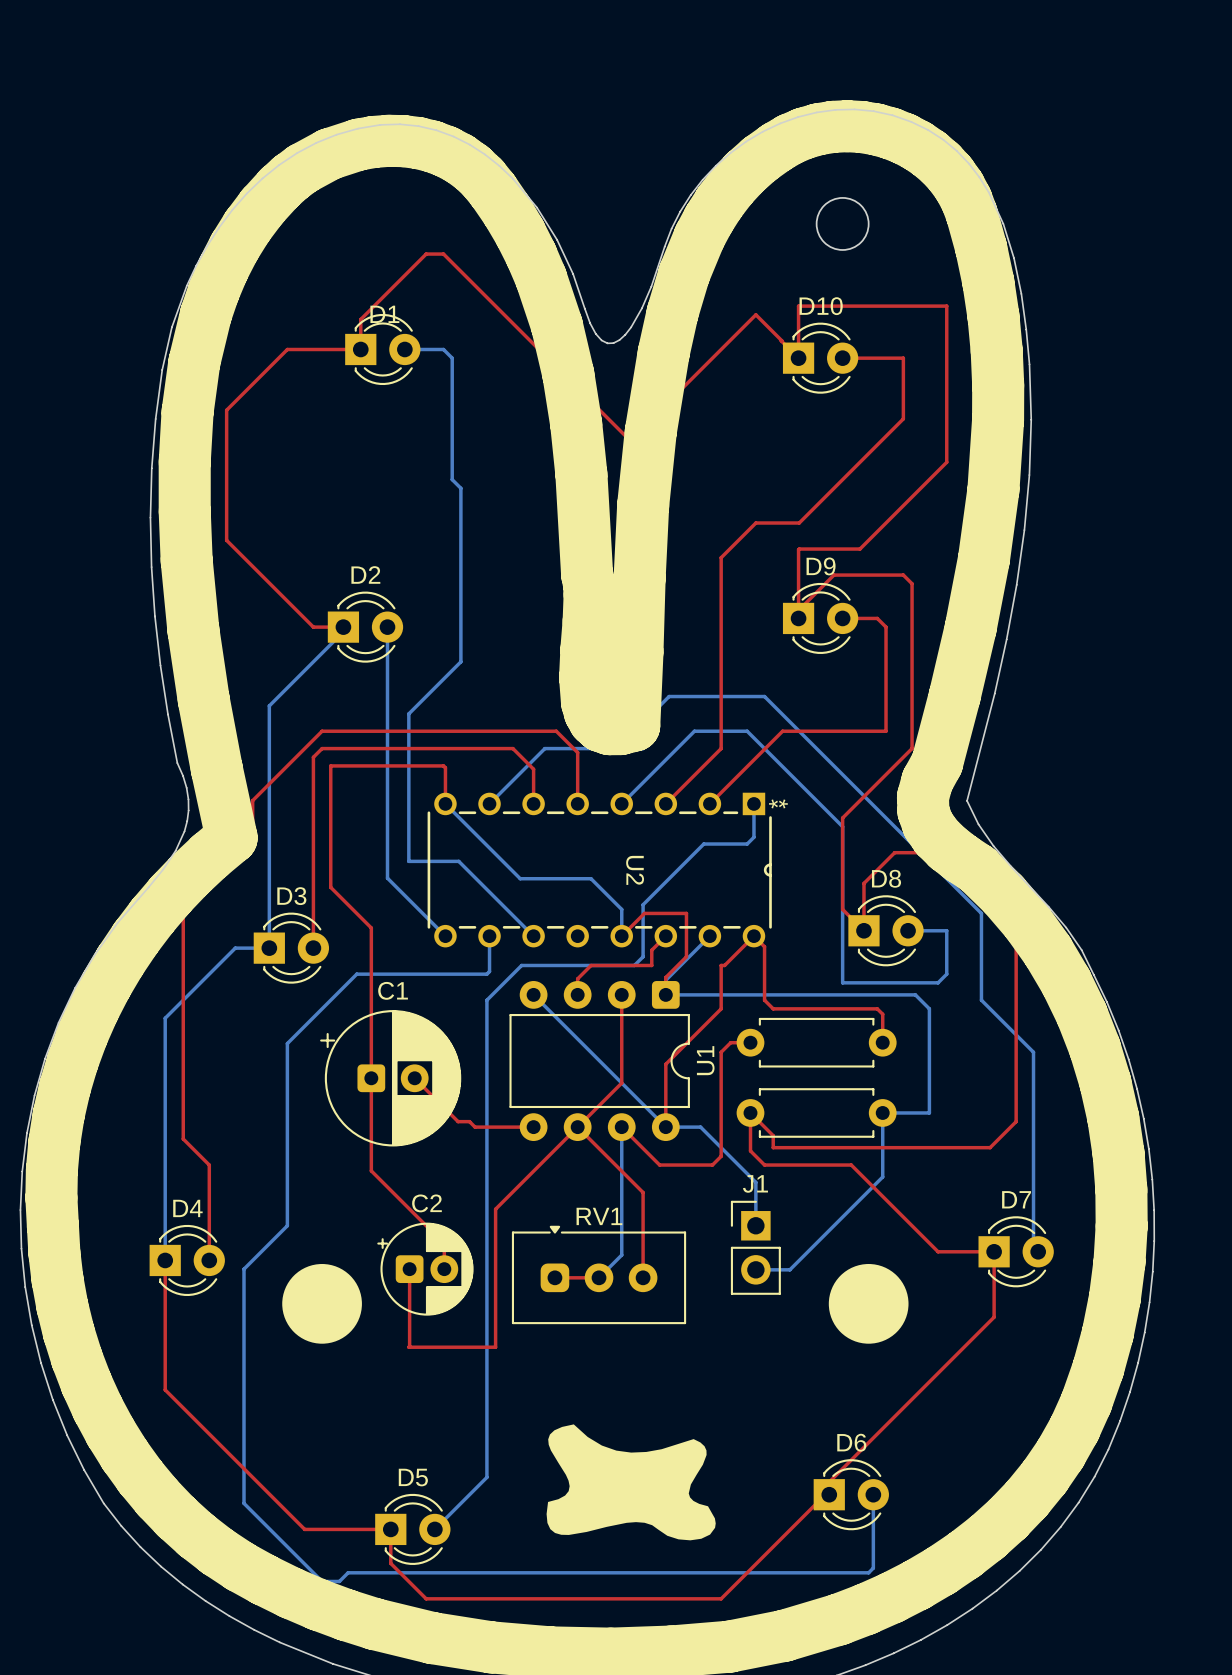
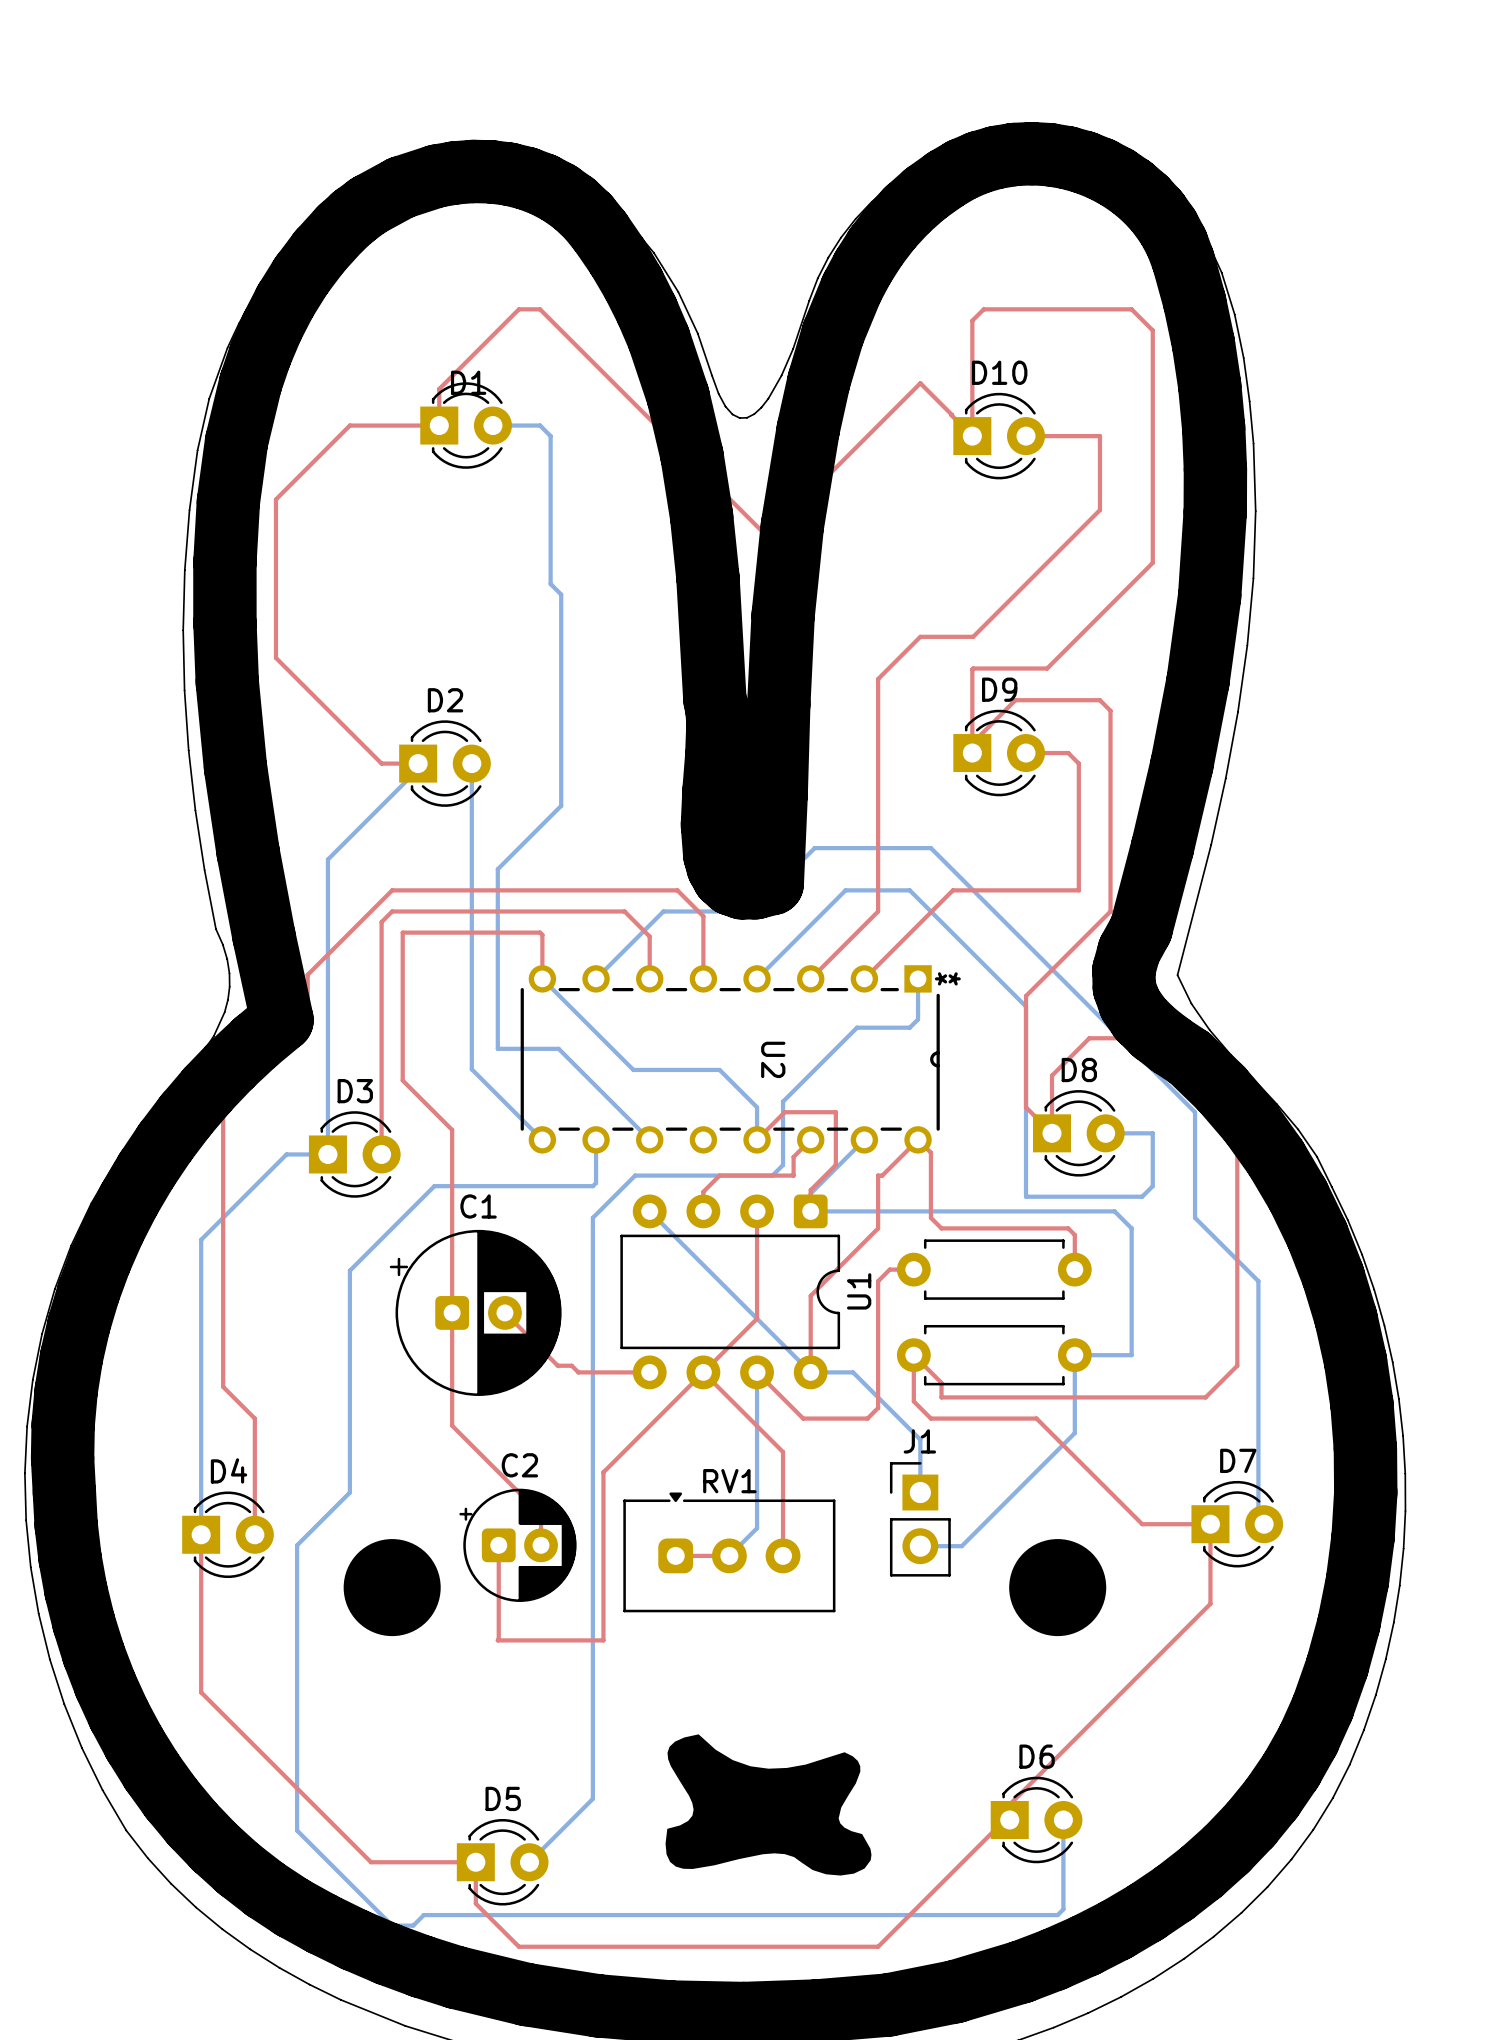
round board edge: [815, 197, 870, 251] -> none
top track: (798, 306) (946, 306) -> (972, 372) (972, 320) (983, 309) (1131, 309) (1152, 330) (1152, 372)

